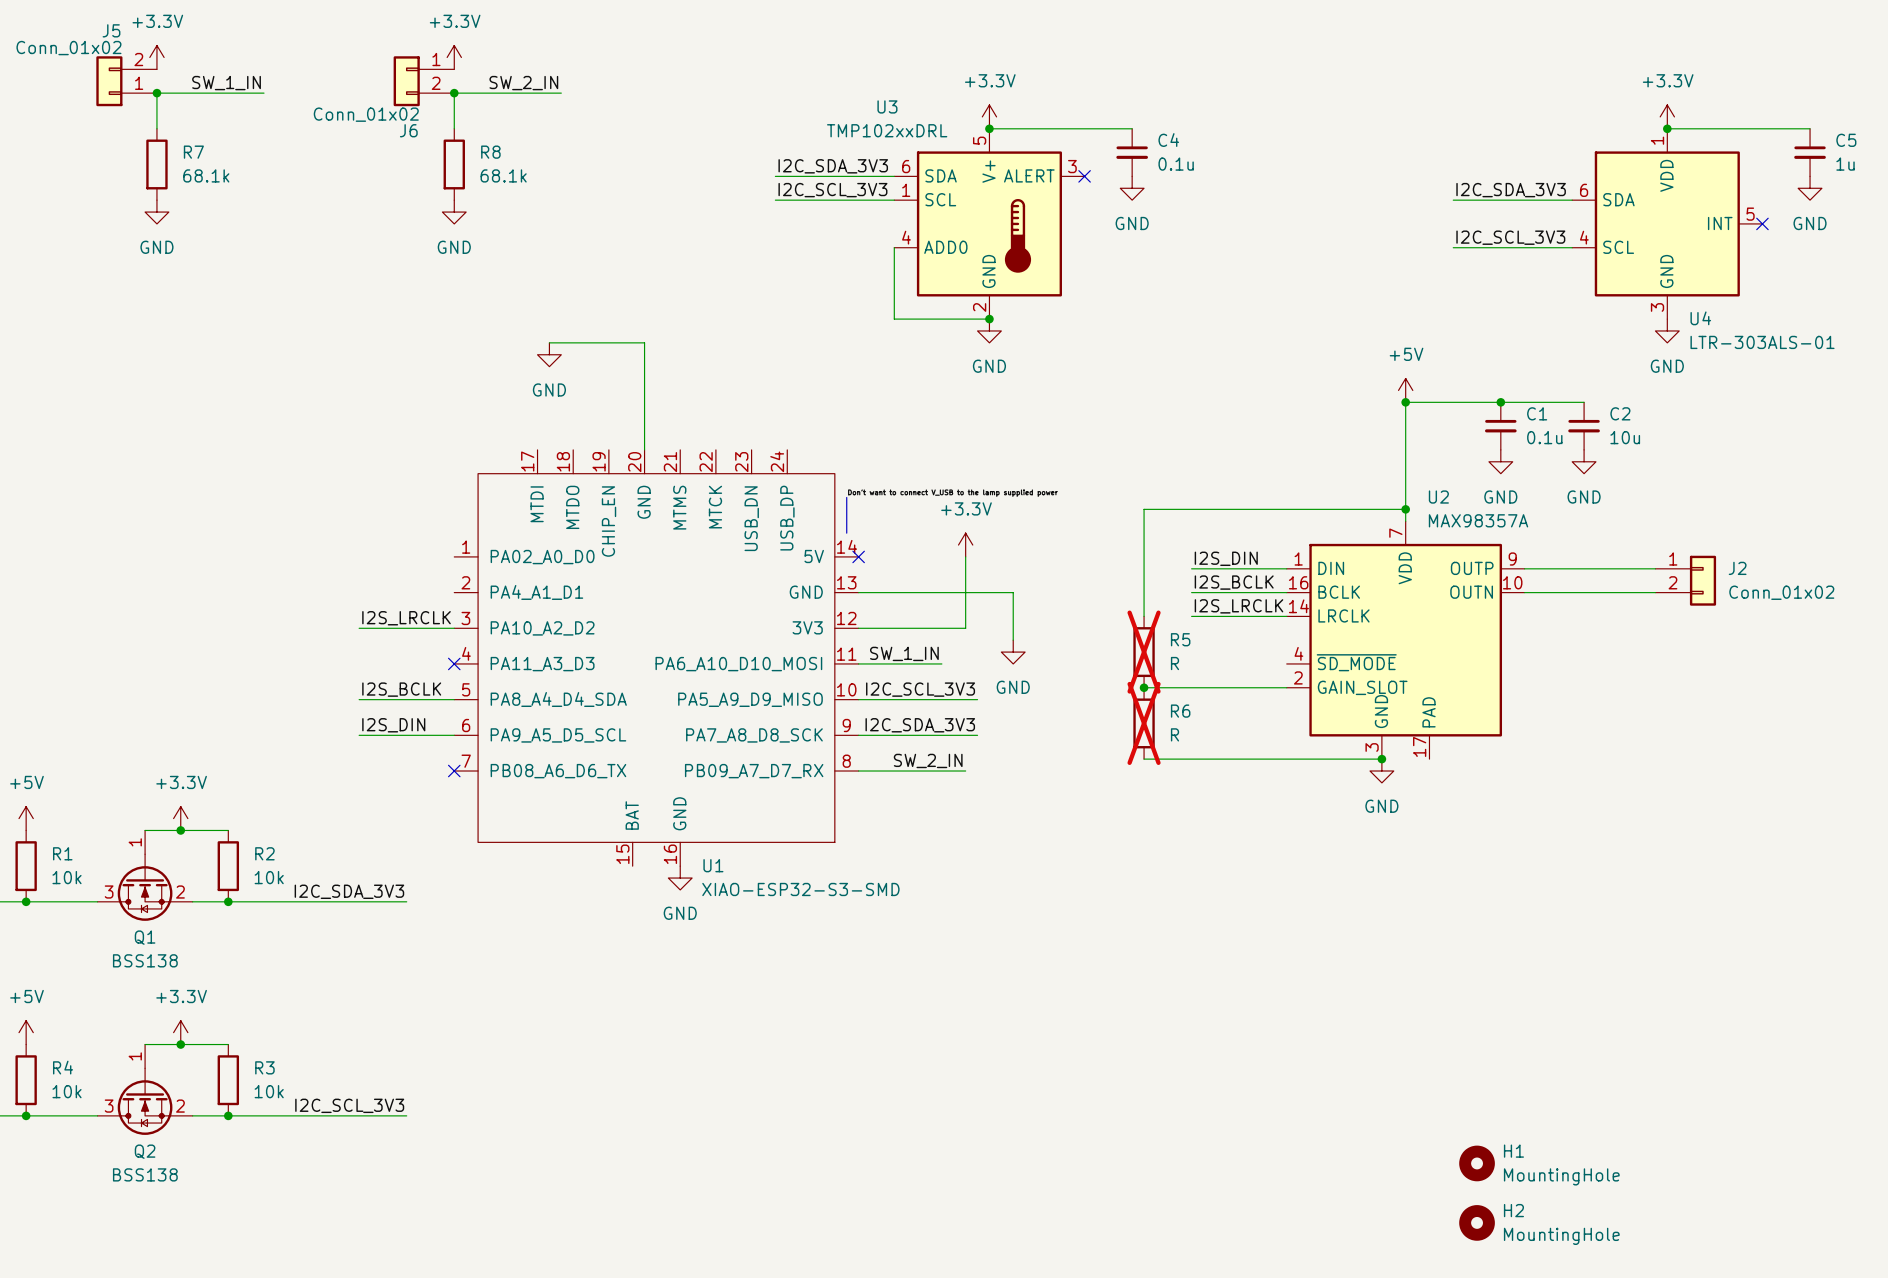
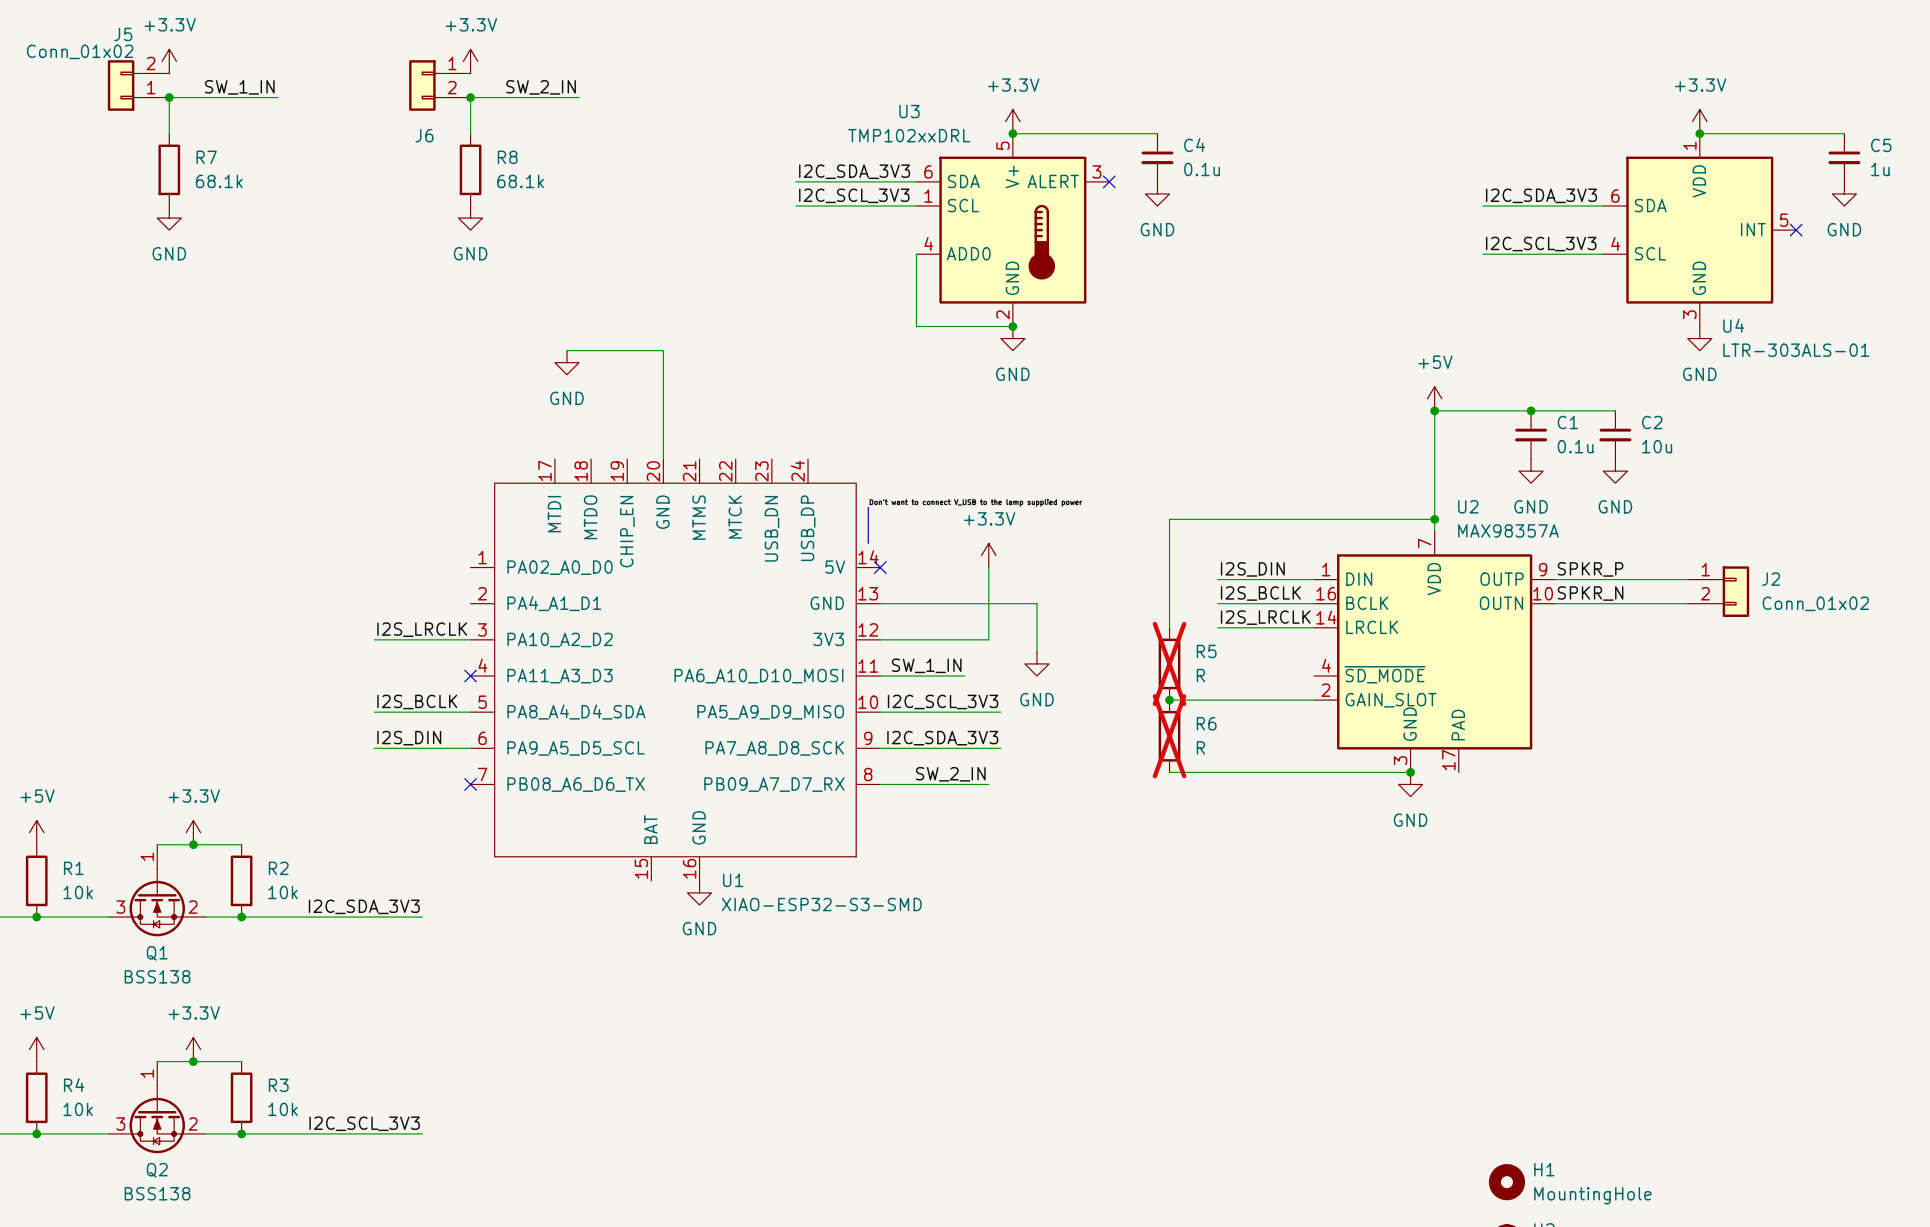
J6 value: Conn_01x02 (366, 114) -> none
label: none -> SPKR_P (1590, 569)
label: none -> SPKR_N (1590, 593)

